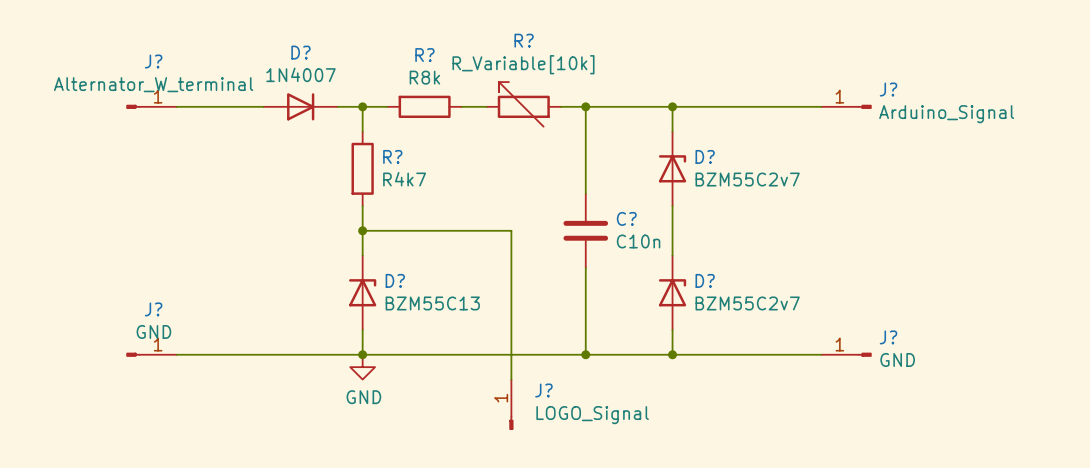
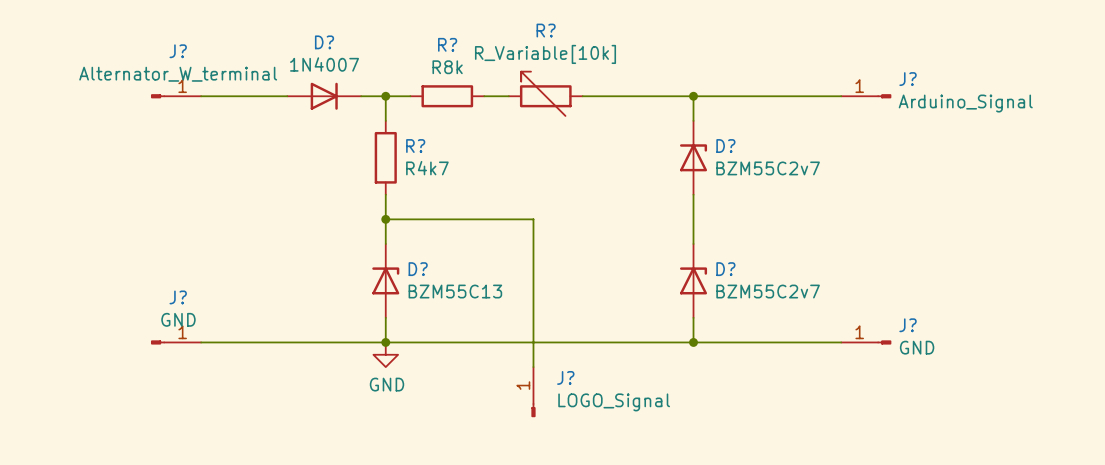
wire: (585, 106) (585, 193) -> none
junction: (585, 106) -> none
C?: C10n (585, 230) -> none
wire: (585, 267) (585, 354) -> none
junction: (585, 354) -> none

